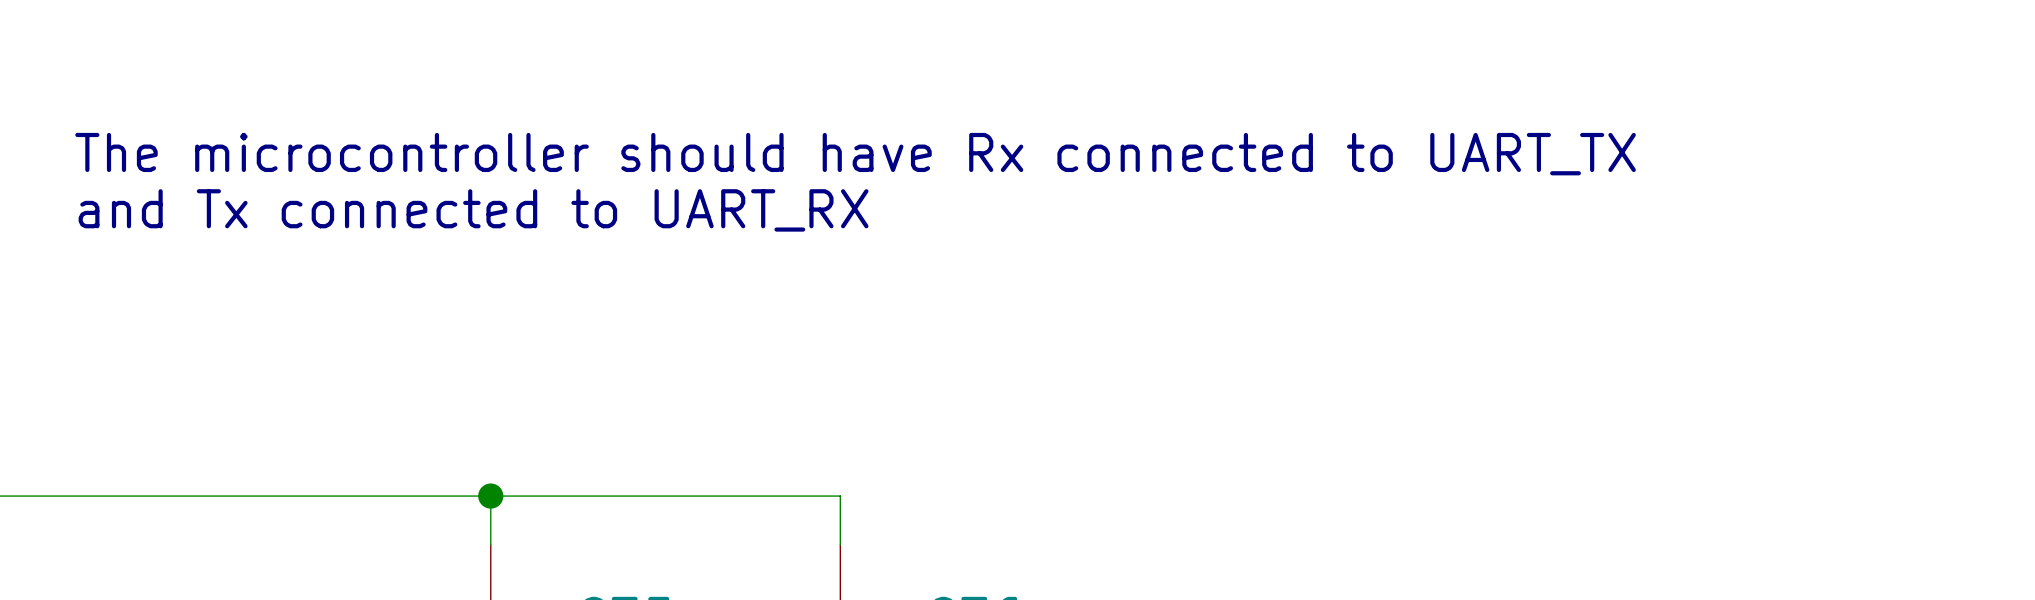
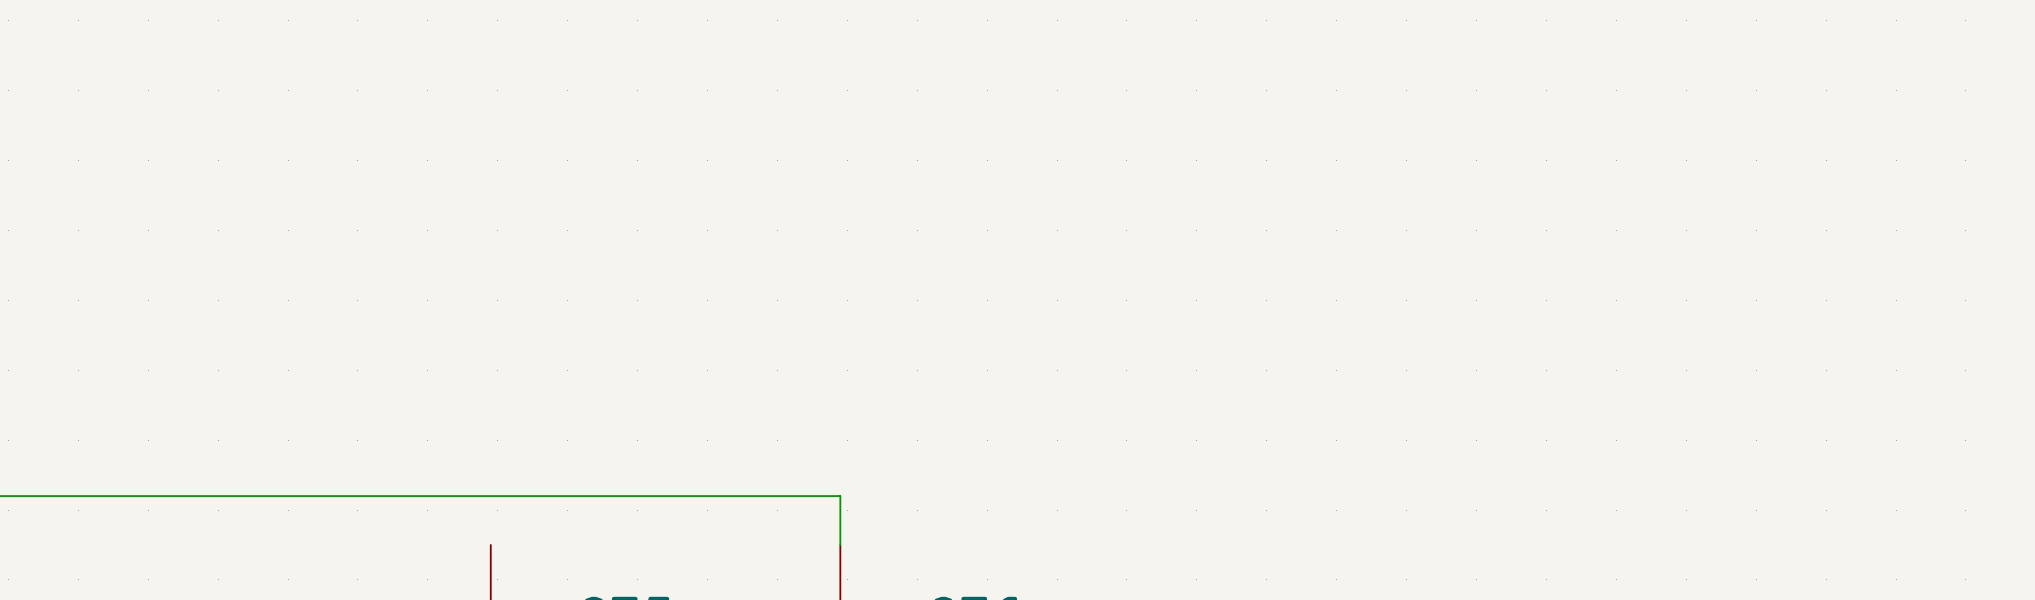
text: The microcontroller should have Rx connected to UART_TX (855, 154) -> none
text: and Tx connected to UART_RX (473, 210) -> none
wire: (490, 496) (490, 544) -> none
junction: (490, 496) -> none

